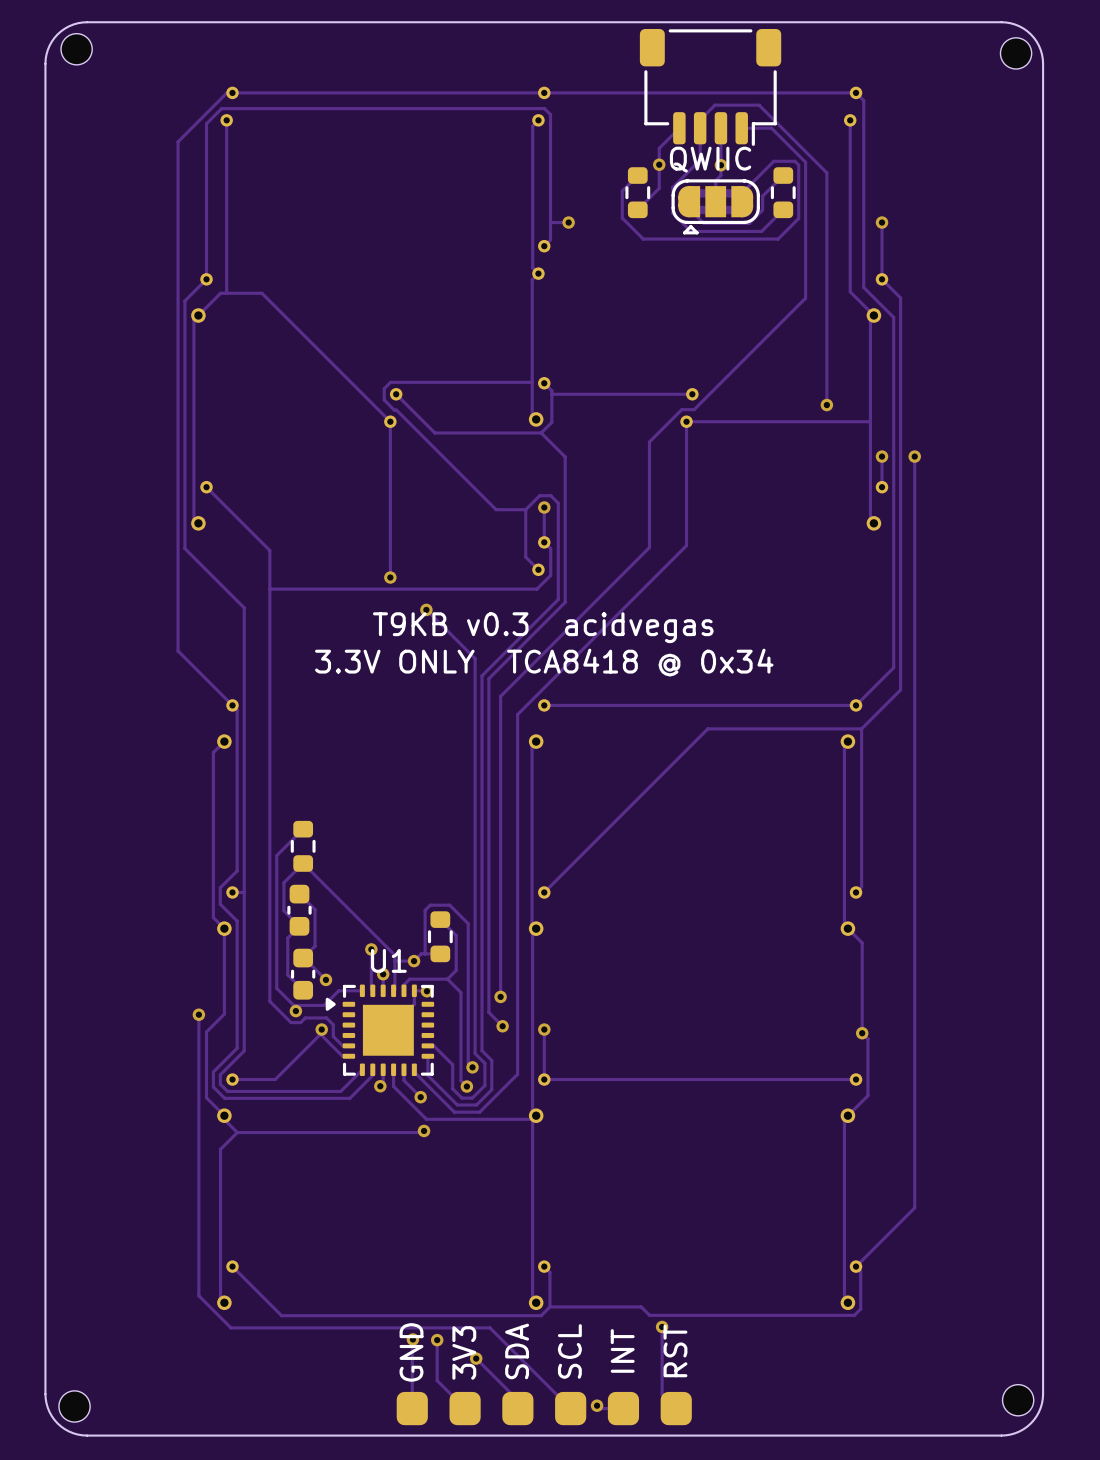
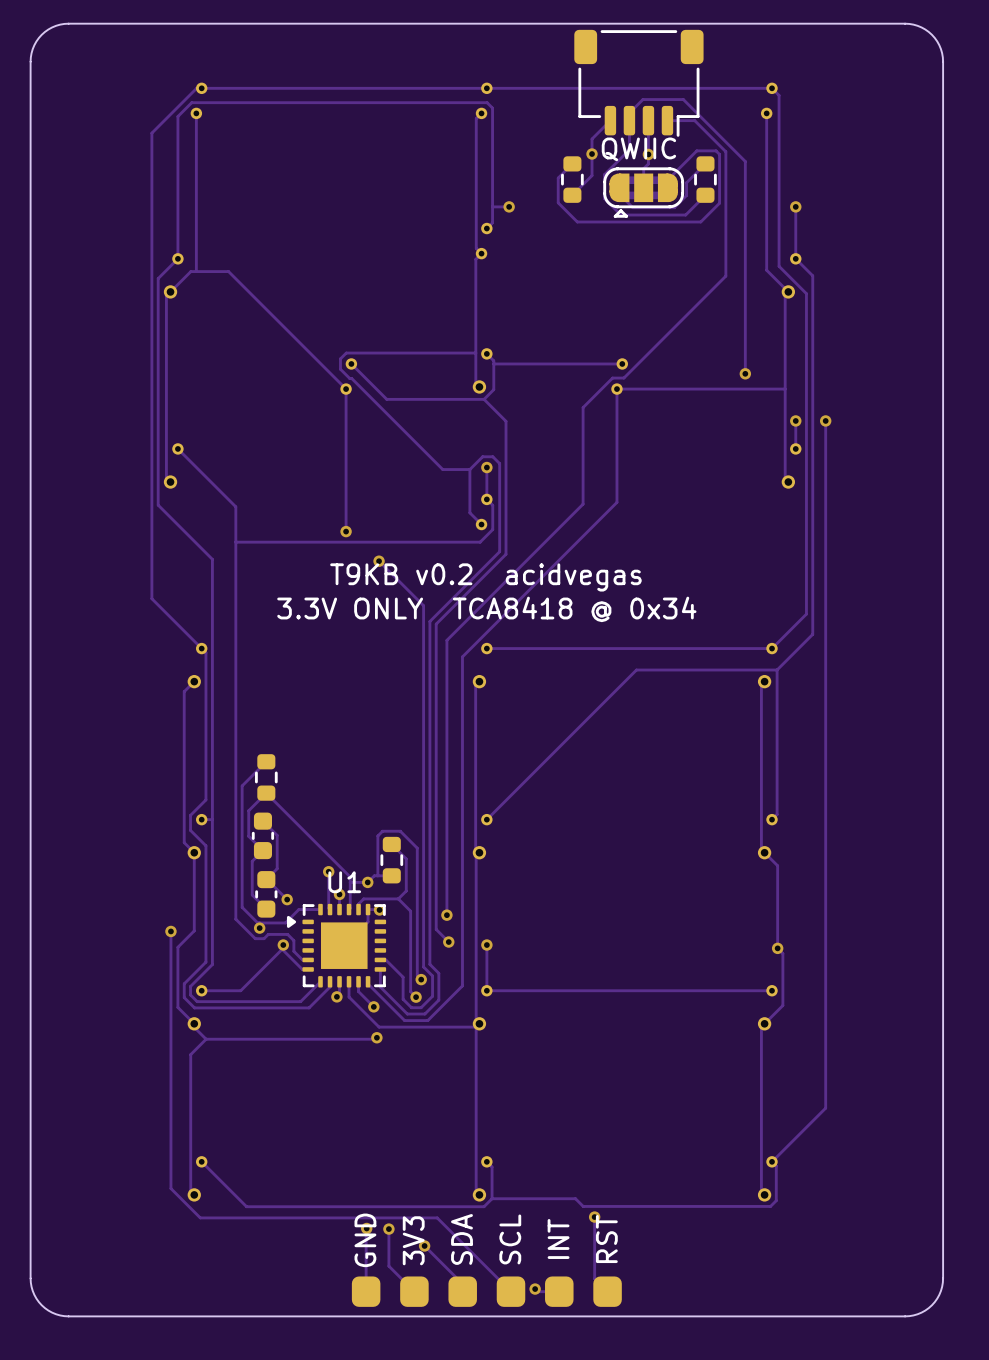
part: (76, 49) -> none
part: (1016, 53) -> none
text: T9KB v0.3 acidvegas (543, 627) -> T9KB v0.2 acidvegas (485, 577)
part: (1018, 1400) -> none
part: (74, 1406) -> none

